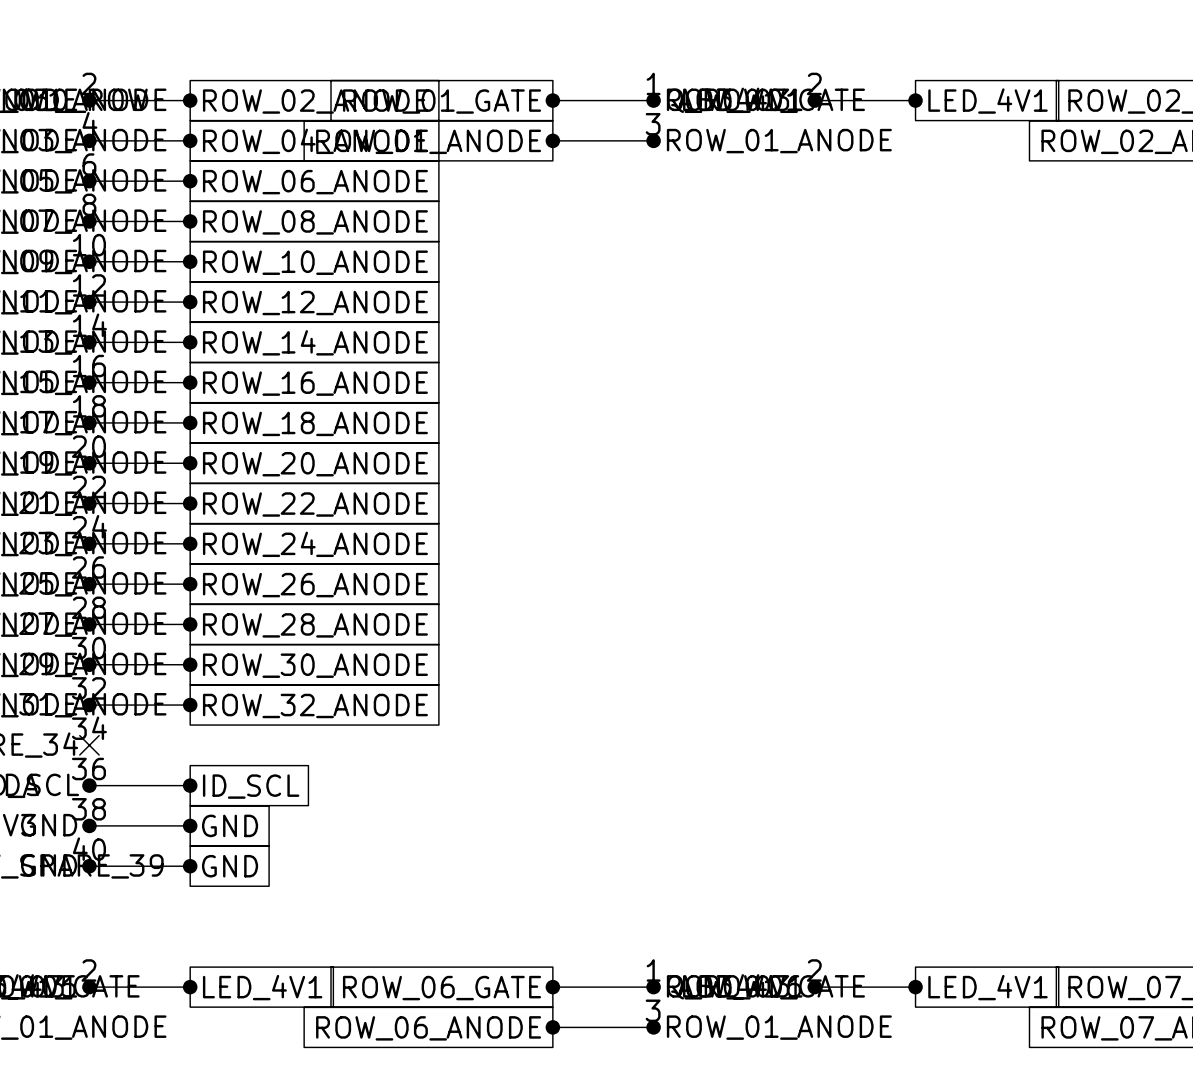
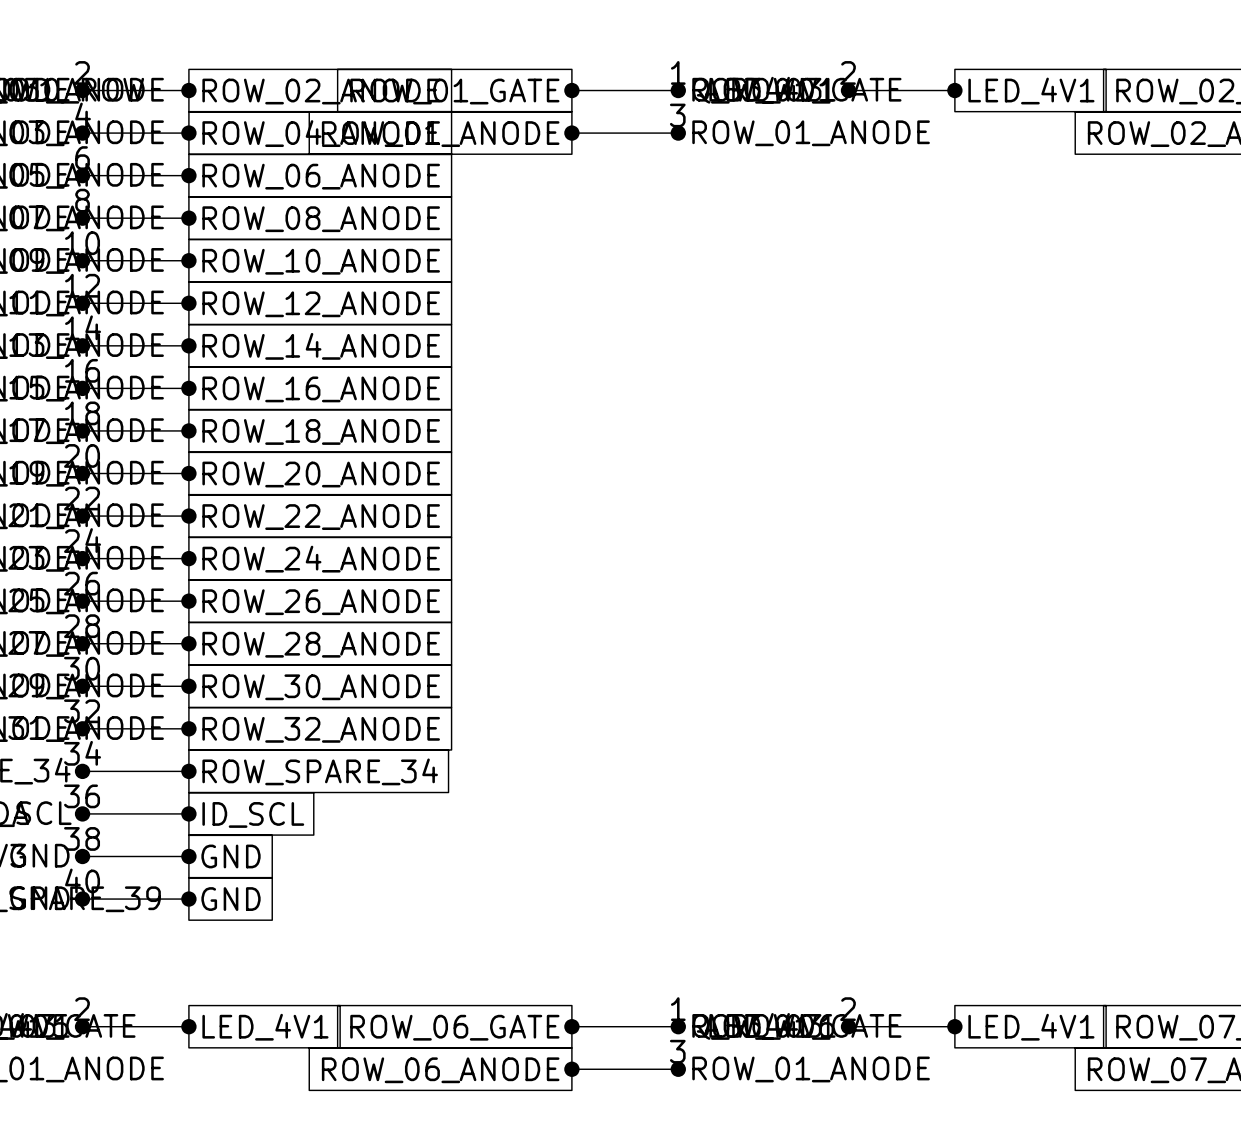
wire: none -> (82, 771) (188, 771)
no-connect mark: (89, 745) -> none
junction: none -> (82, 771)
junction: none -> (188, 771)
global label: none -> ROW_SPARE_34 (320, 771)

